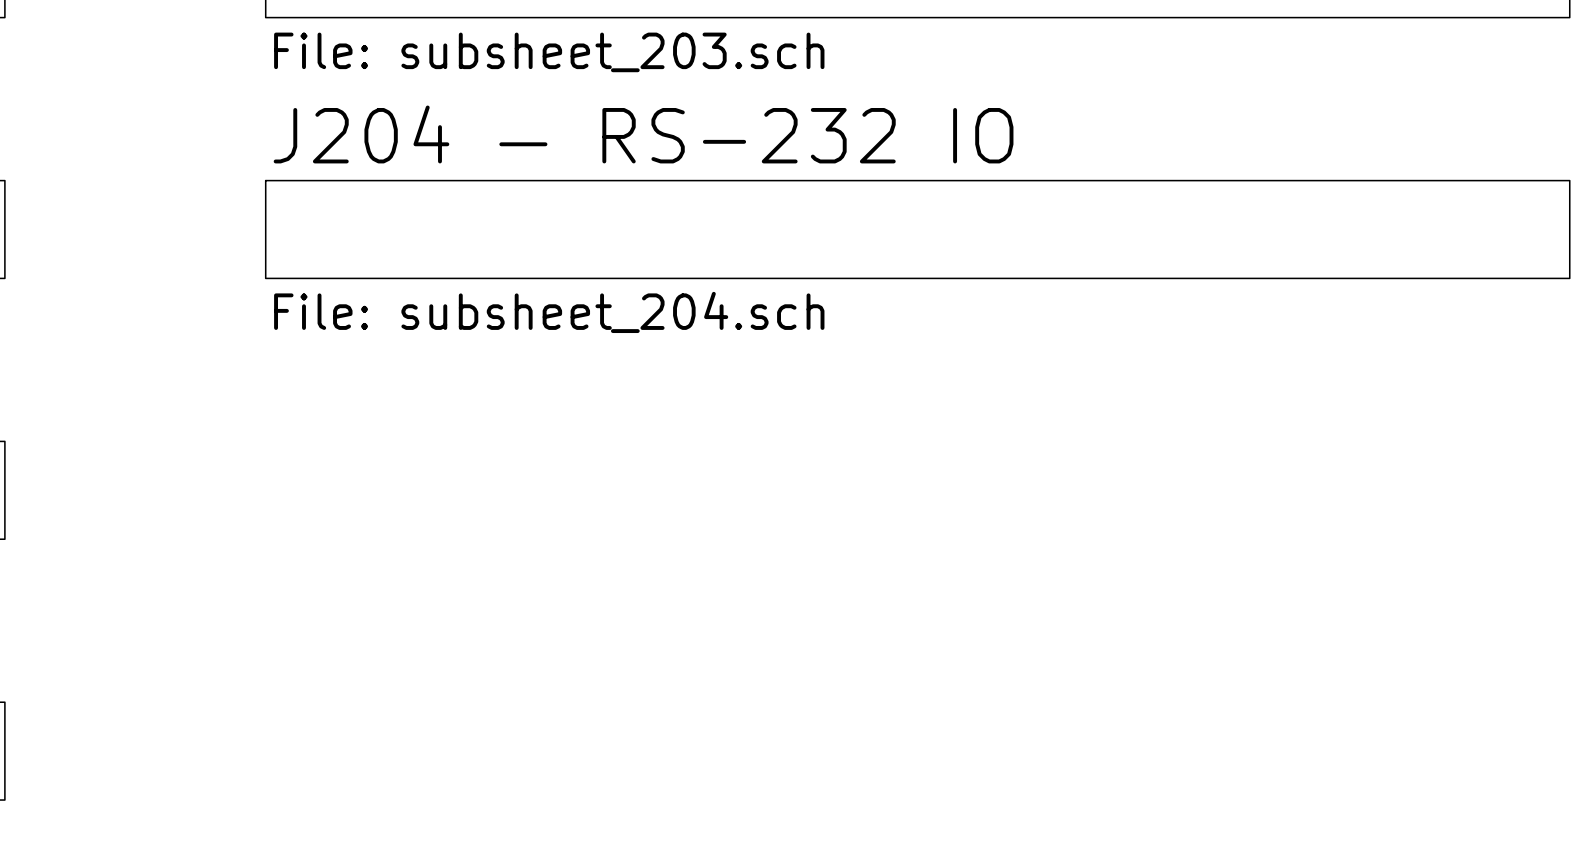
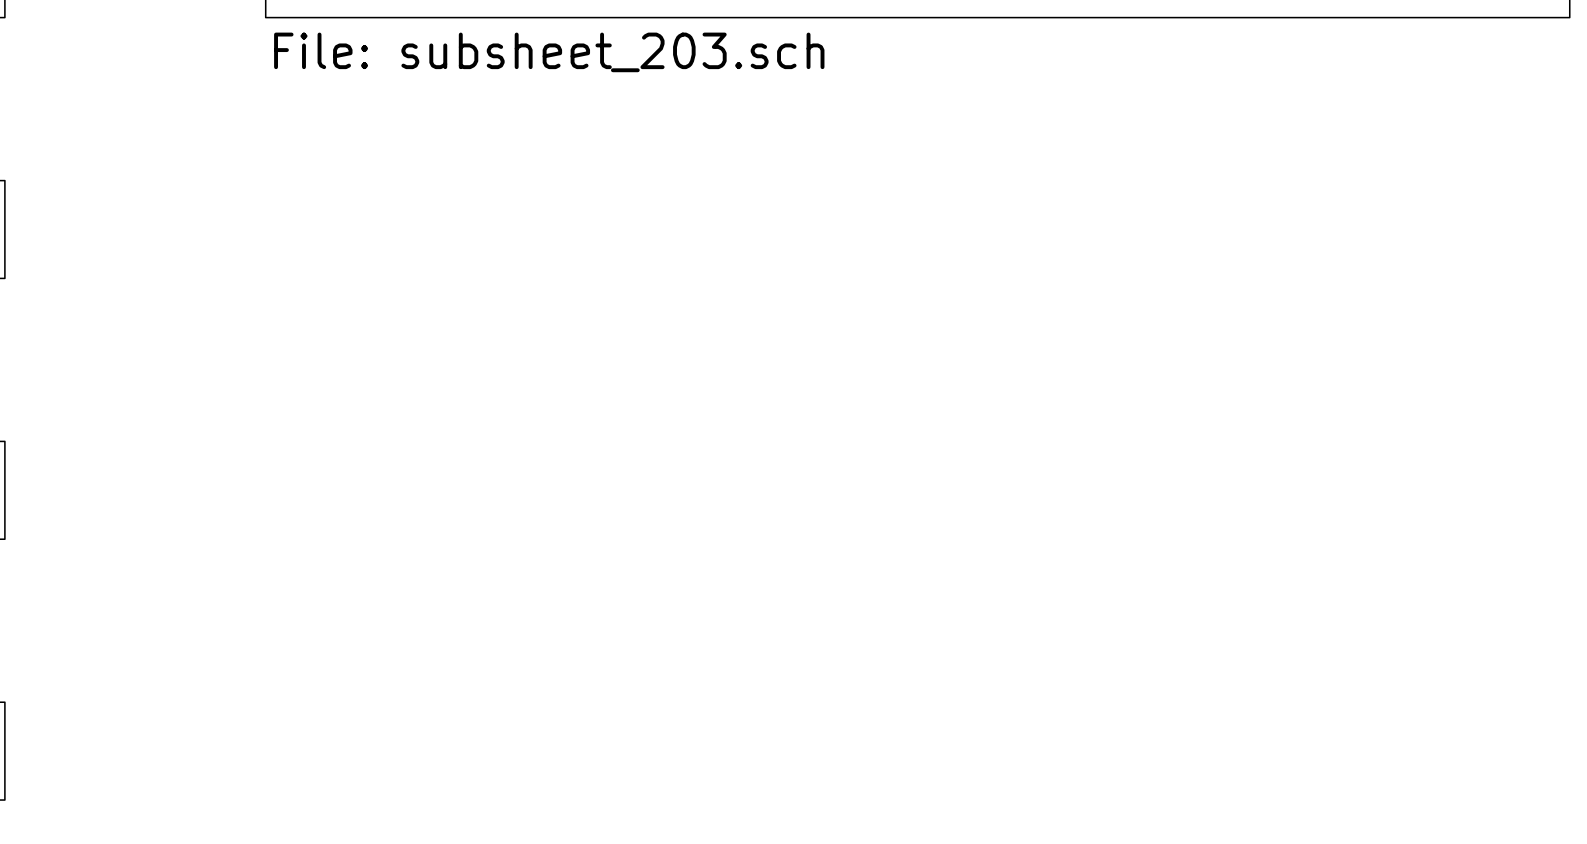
sheet J204 — RS-232 IO: File: subsheet_204.sch (917, 229) -> none

